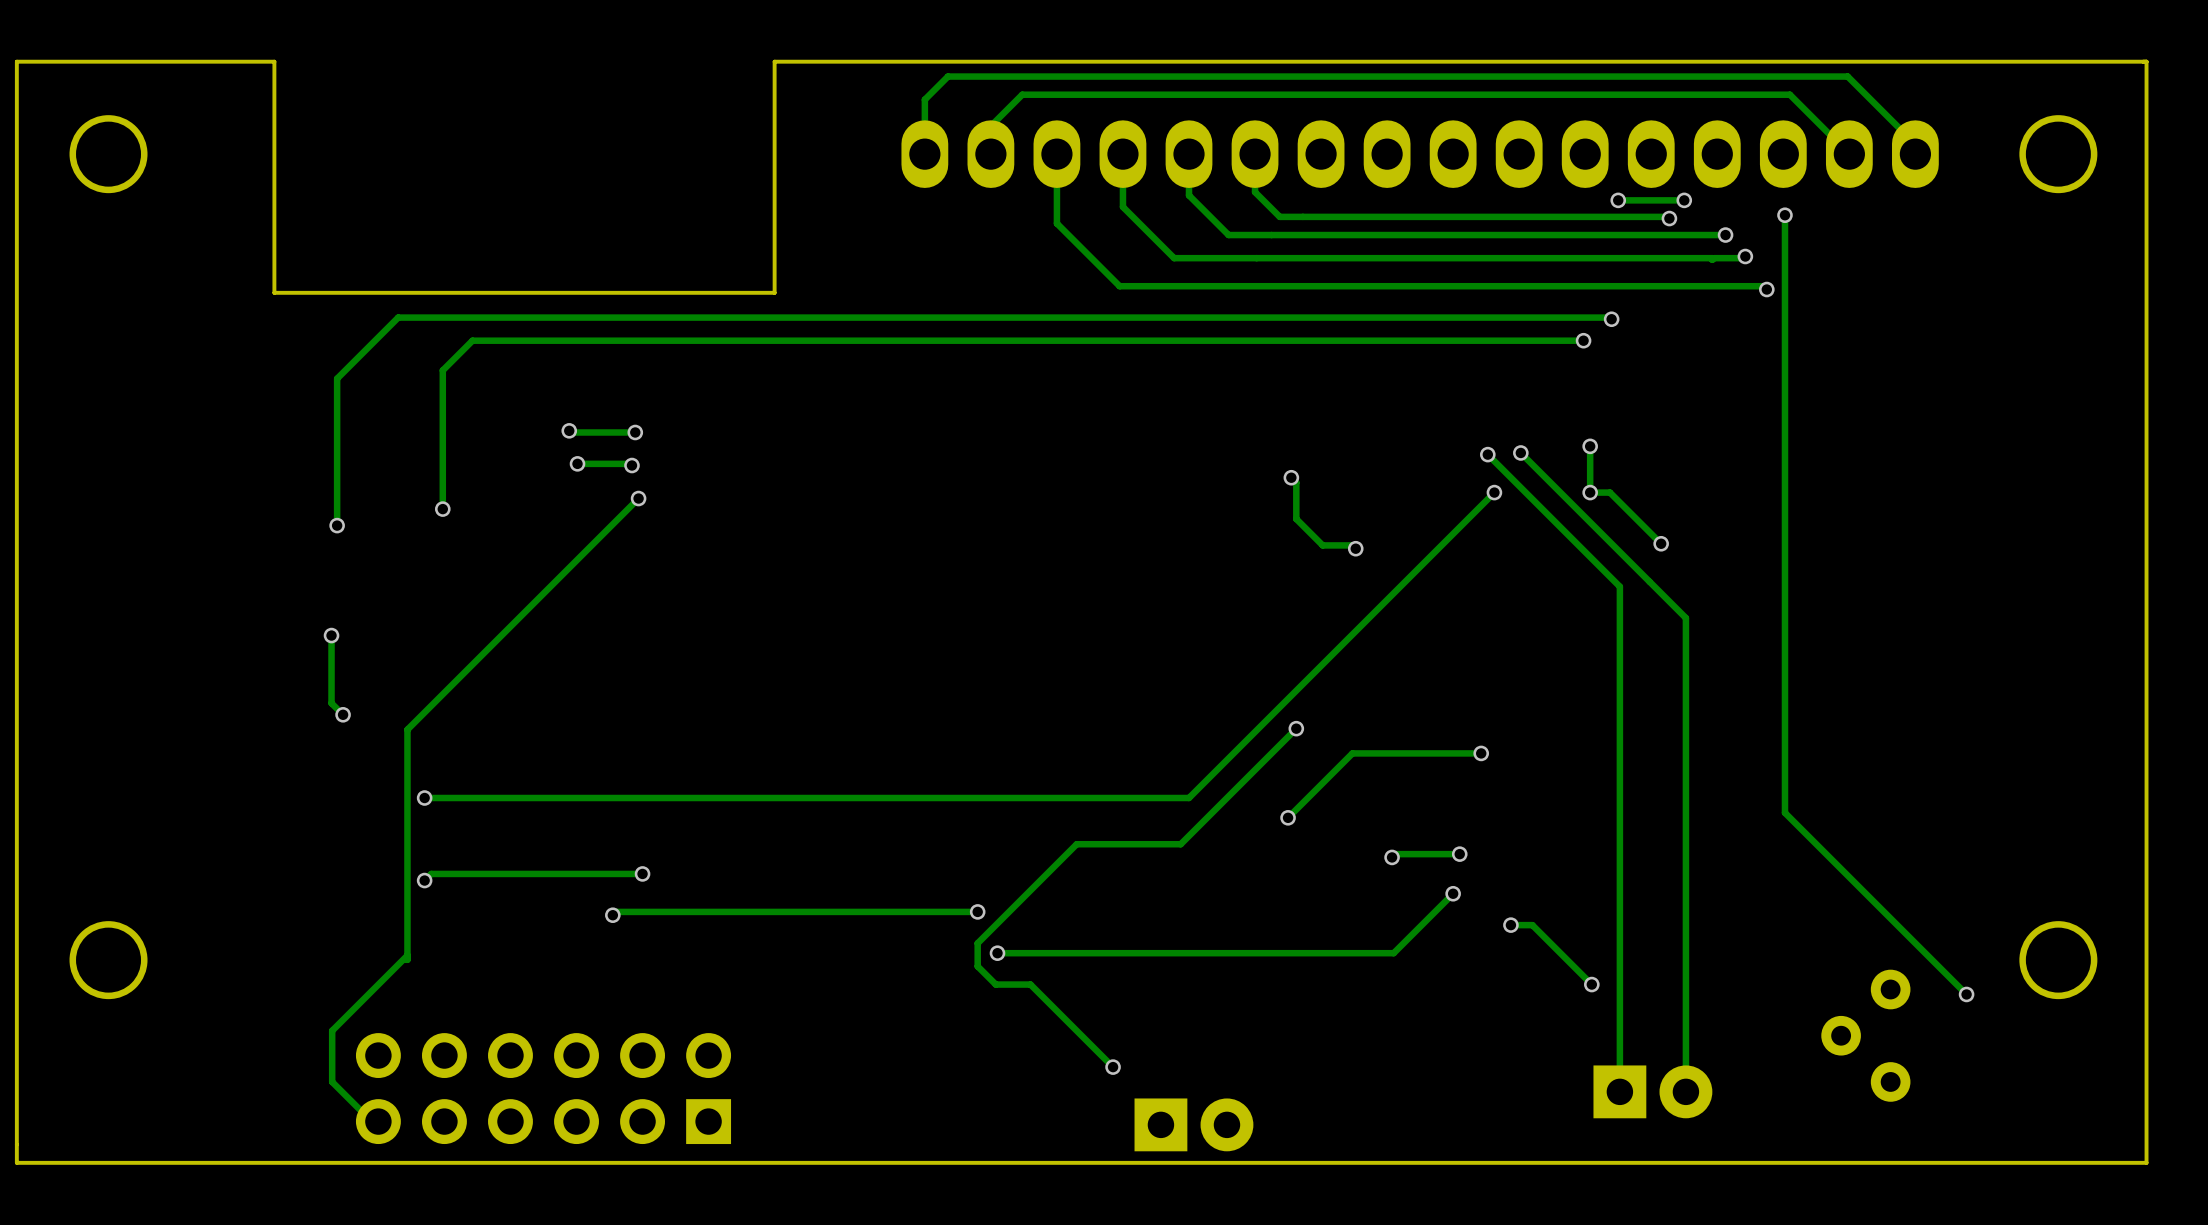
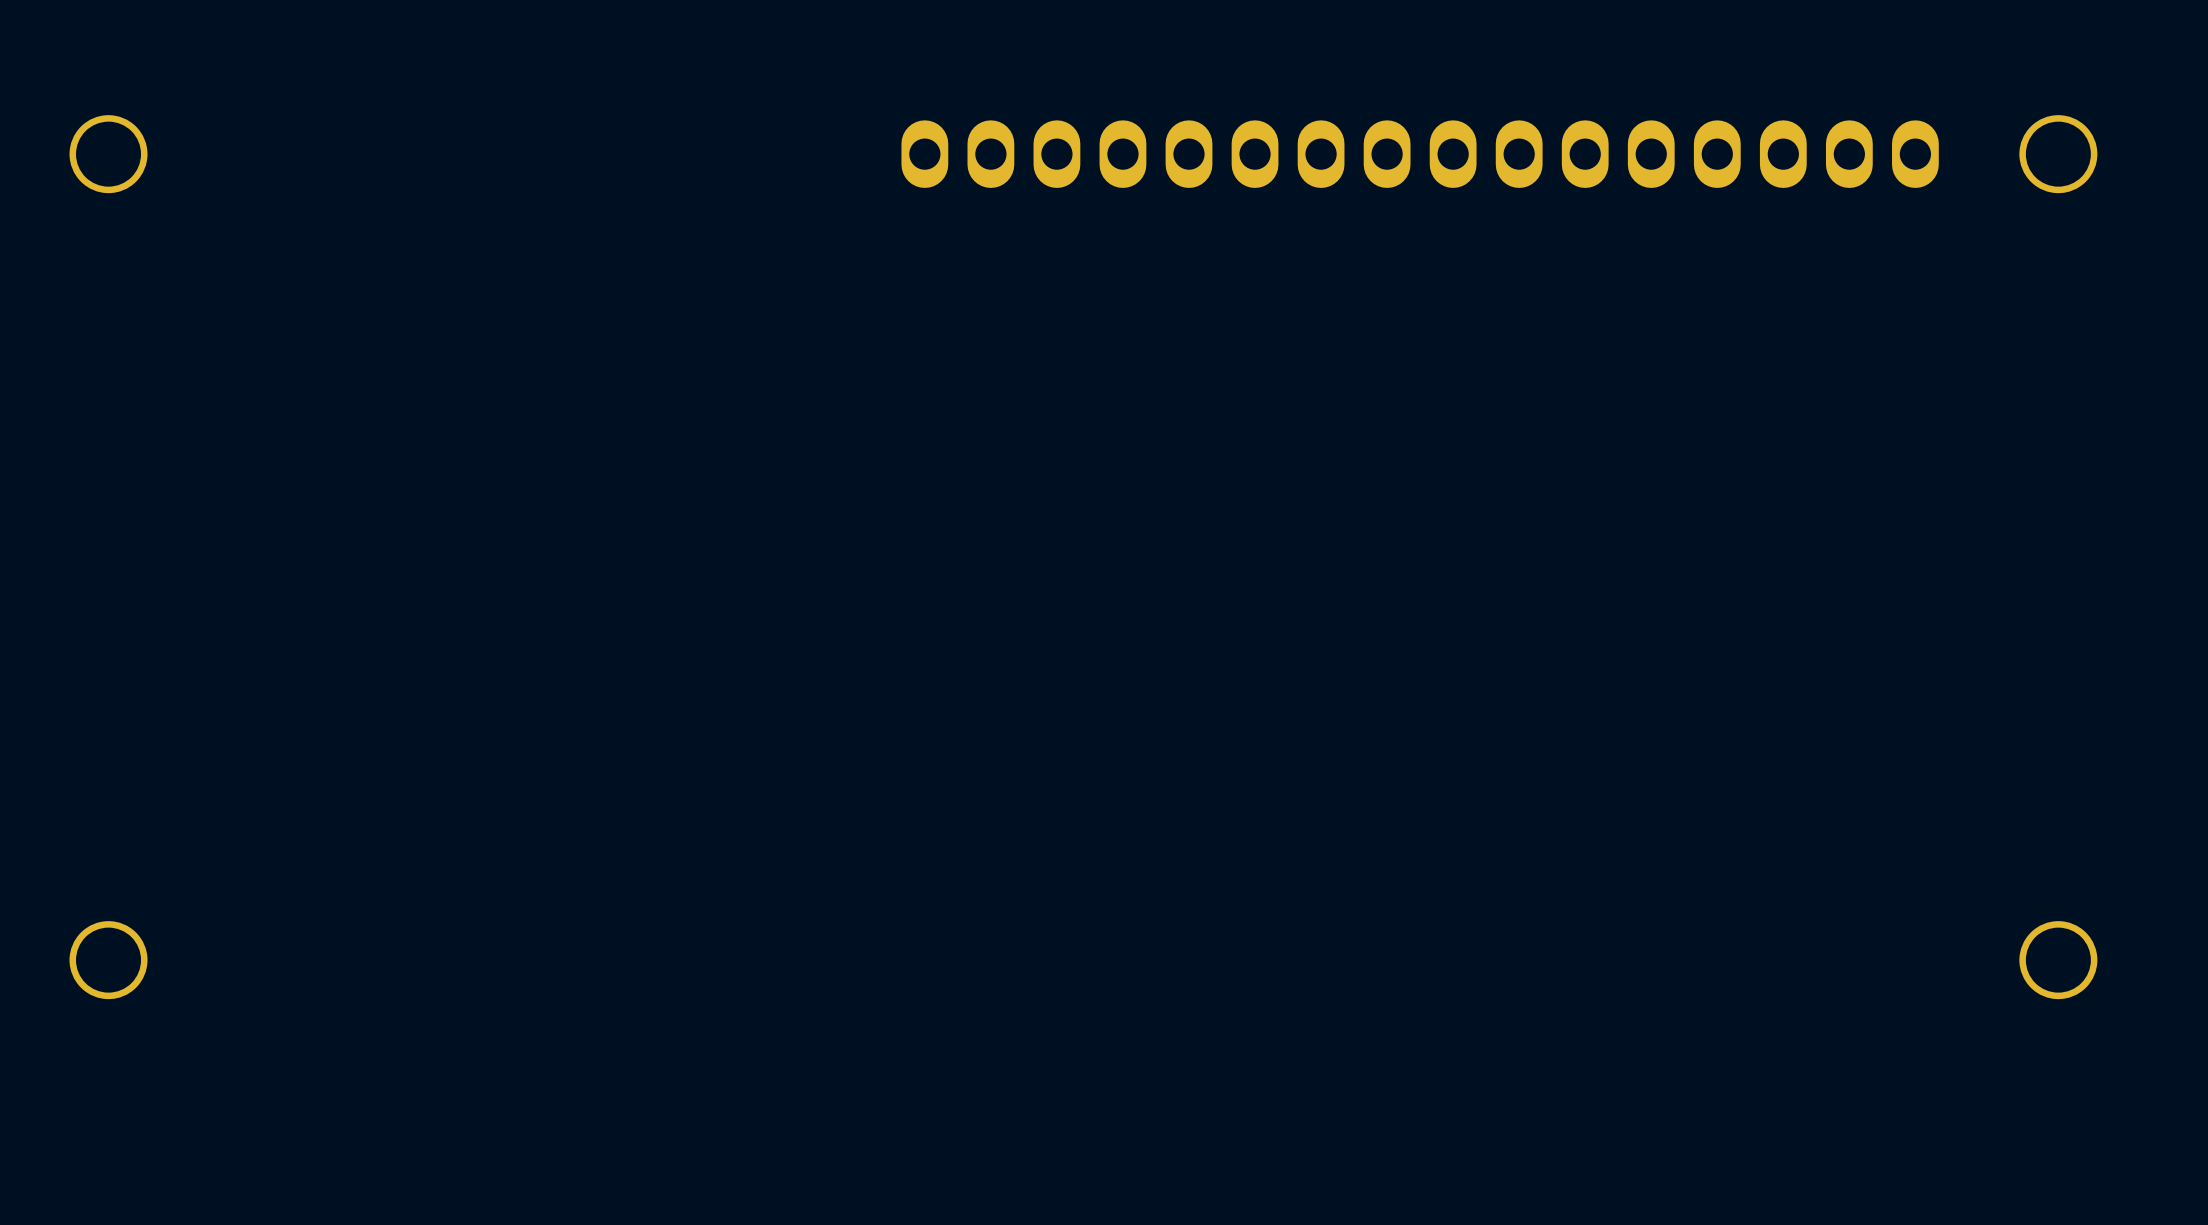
board edge: (2146, 61) (774, 61) (774, 292) (274, 292) (274, 61) (16, 61) (16, 1162) (2146, 1162) (2146, 61) -> none
track: (1056, 154) (1056, 223) (1119, 286) (1763, 286) (1766, 289) -> none
track: (1122, 154) (1122, 206) (1174, 258) (1712, 258) (1712, 259) (1745, 256) -> none
track: (1189, 154) (1189, 195) (1228, 235) (1725, 235) -> none
track: (1255, 154) (1255, 192) (1279, 216) (1667, 216) (1669, 218) -> none
track: (1849, 154) (1789, 94) (1022, 94) (990, 126) (990, 154) -> none
track: (1915, 154) (1915, 144) (1847, 76) (947, 76) (924, 99) (924, 154) -> none
via: (1618, 200) -> none
track: (1684, 200) (1618, 200) -> none
via: (1684, 200) -> none
track: (1784, 215) (1784, 812) (1966, 994) -> none
via: (1784, 215) -> none
via: (1669, 218) -> none
via: (1725, 235) -> none
via: (1745, 256) -> none
via: (1766, 289) -> none
track: (1611, 319) (1609, 317) (398, 317) (337, 378) (337, 525) -> none
via: (1611, 319) -> none
track: (1583, 340) (472, 340) (442, 370) (442, 509) -> none
via: (1583, 340) -> none
track: (569, 430) (570, 432) (635, 432) -> none
via: (569, 430) -> none
via: (635, 432) -> none
track: (1590, 446) (1590, 492) (1609, 492) (1661, 543) -> none
via: (1590, 446) -> none
track: (1520, 452) (1685, 618) (1685, 1091) -> none
via: (1520, 452) -> none
track: (1487, 454) (1619, 586) (1619, 1091) -> none
via: (1487, 454) -> none
track: (577, 463) (630, 463) (631, 465) -> none
via: (577, 463) -> none
via: (631, 465) -> none
track: (1291, 477) (1296, 482) (1296, 519) (1322, 545) (1352, 545) (1355, 548) -> none
via: (1291, 477) -> none
track: (1494, 492) (1189, 798) (424, 798) -> none
via: (1494, 492) -> none
via: (1590, 492) -> none
track: (638, 498) (407, 729) (407, 959) (404, 959) (407, 957) -> none
via: (638, 498) -> none
via: (442, 509) -> none
via: (337, 525) -> none
via: (1661, 543) -> none
via: (1355, 548) -> none
track: (331, 635) (331, 703) (343, 714) -> none
via: (331, 635) -> none
via: (343, 714) -> none
track: (1296, 728) (1180, 844) (1076, 844) (977, 943) (977, 966) (995, 984) (1030, 984) (1113, 1067) -> none
via: (1296, 728) -> none
track: (1481, 753) (1352, 753) (1288, 817) -> none
via: (1481, 753) -> none
via: (424, 798) -> none
via: (1288, 817) -> none
track: (1459, 854) (1395, 854) (1392, 857) -> none
via: (1459, 854) -> none
via: (1392, 857) -> none
track: (642, 873) (431, 873) (424, 880) -> none
via: (642, 873) -> none
via: (424, 880) -> none
track: (1453, 893) (1393, 953) (997, 953) -> none
via: (1453, 893) -> none
track: (977, 911) (616, 911) (612, 915) -> none
via: (977, 911) -> none
via: (612, 915) -> none
track: (1510, 925) (1532, 925) (1591, 984) -> none
via: (1510, 925) -> none
via: (997, 953) -> none
track: (407, 955) (332, 1030) (332, 1081) (371, 1121) (378, 1121) -> none
via: (1591, 984) -> none
via: (1966, 994) -> none
part: (1865, 1035) -> none
via: (1113, 1067) -> none
part: (543, 1088) -> none
part: (1652, 1091) -> none
part: (1193, 1124) -> none

